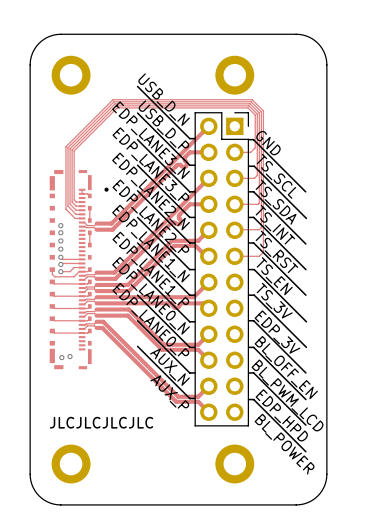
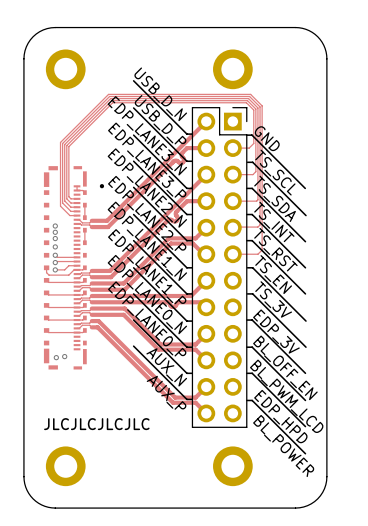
via: (60, 225) -> none
via: none -> (55, 226)
via: (60, 232) -> none
via: none -> (55, 232)

